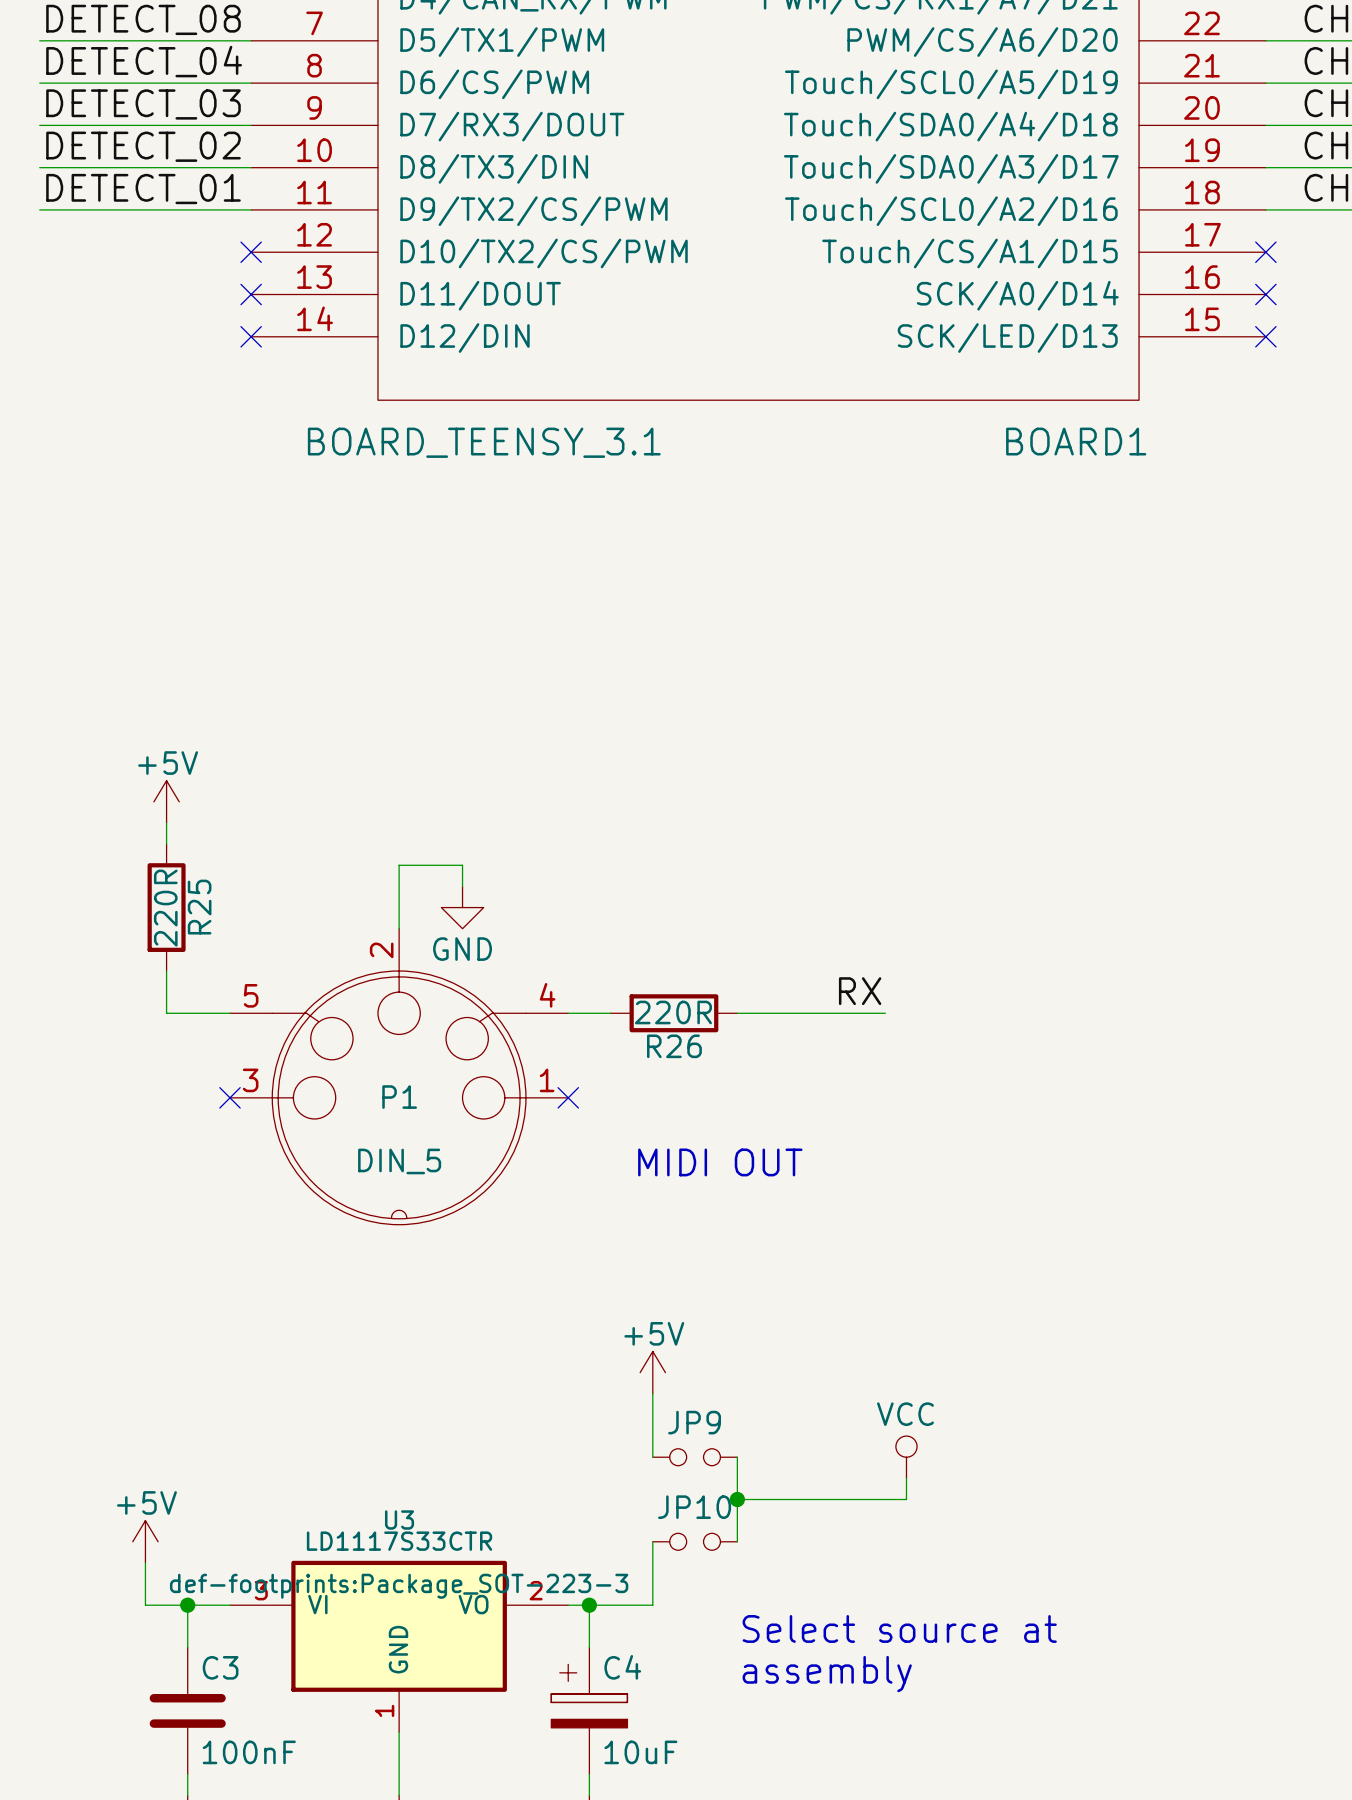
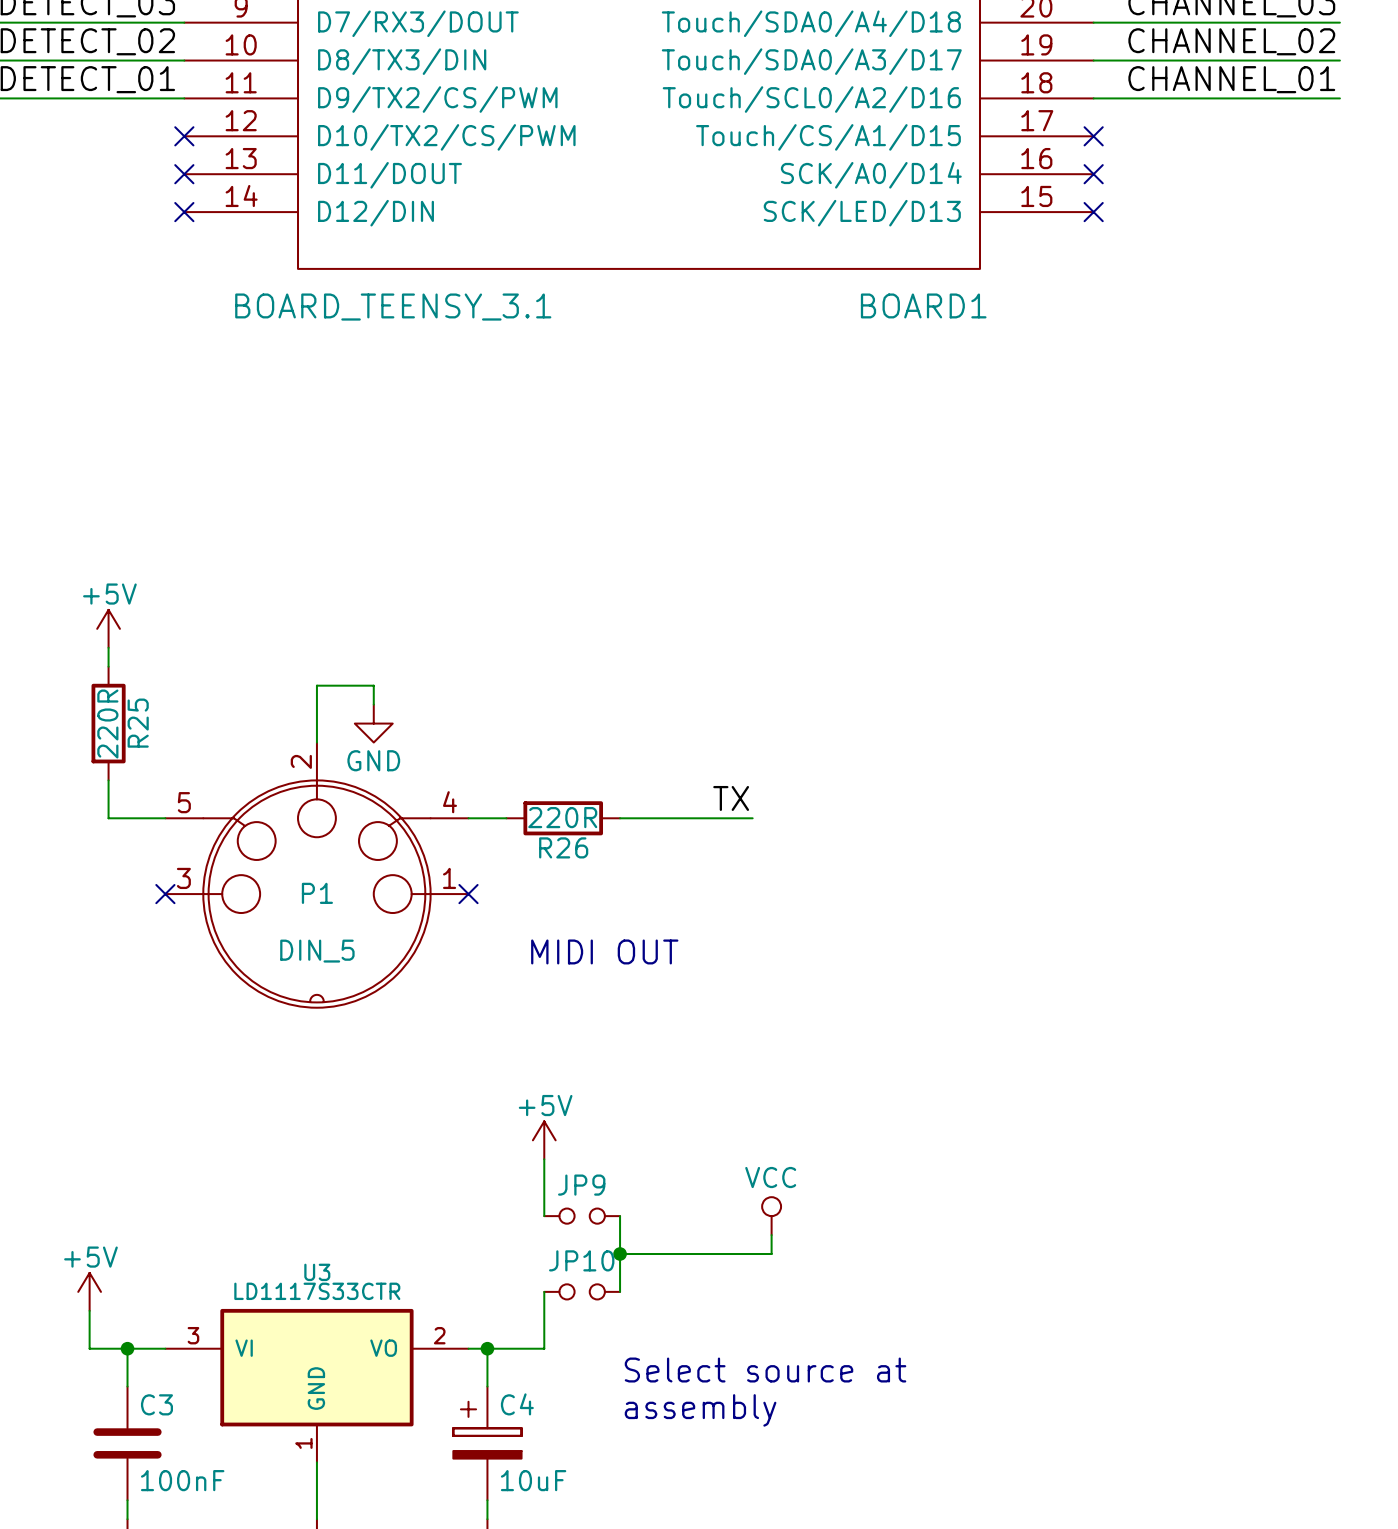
label: RX (860, 991) -> TX (731, 798)
U3 text: def-footprints:Package_SOT-223-3 (399, 1586) -> none

